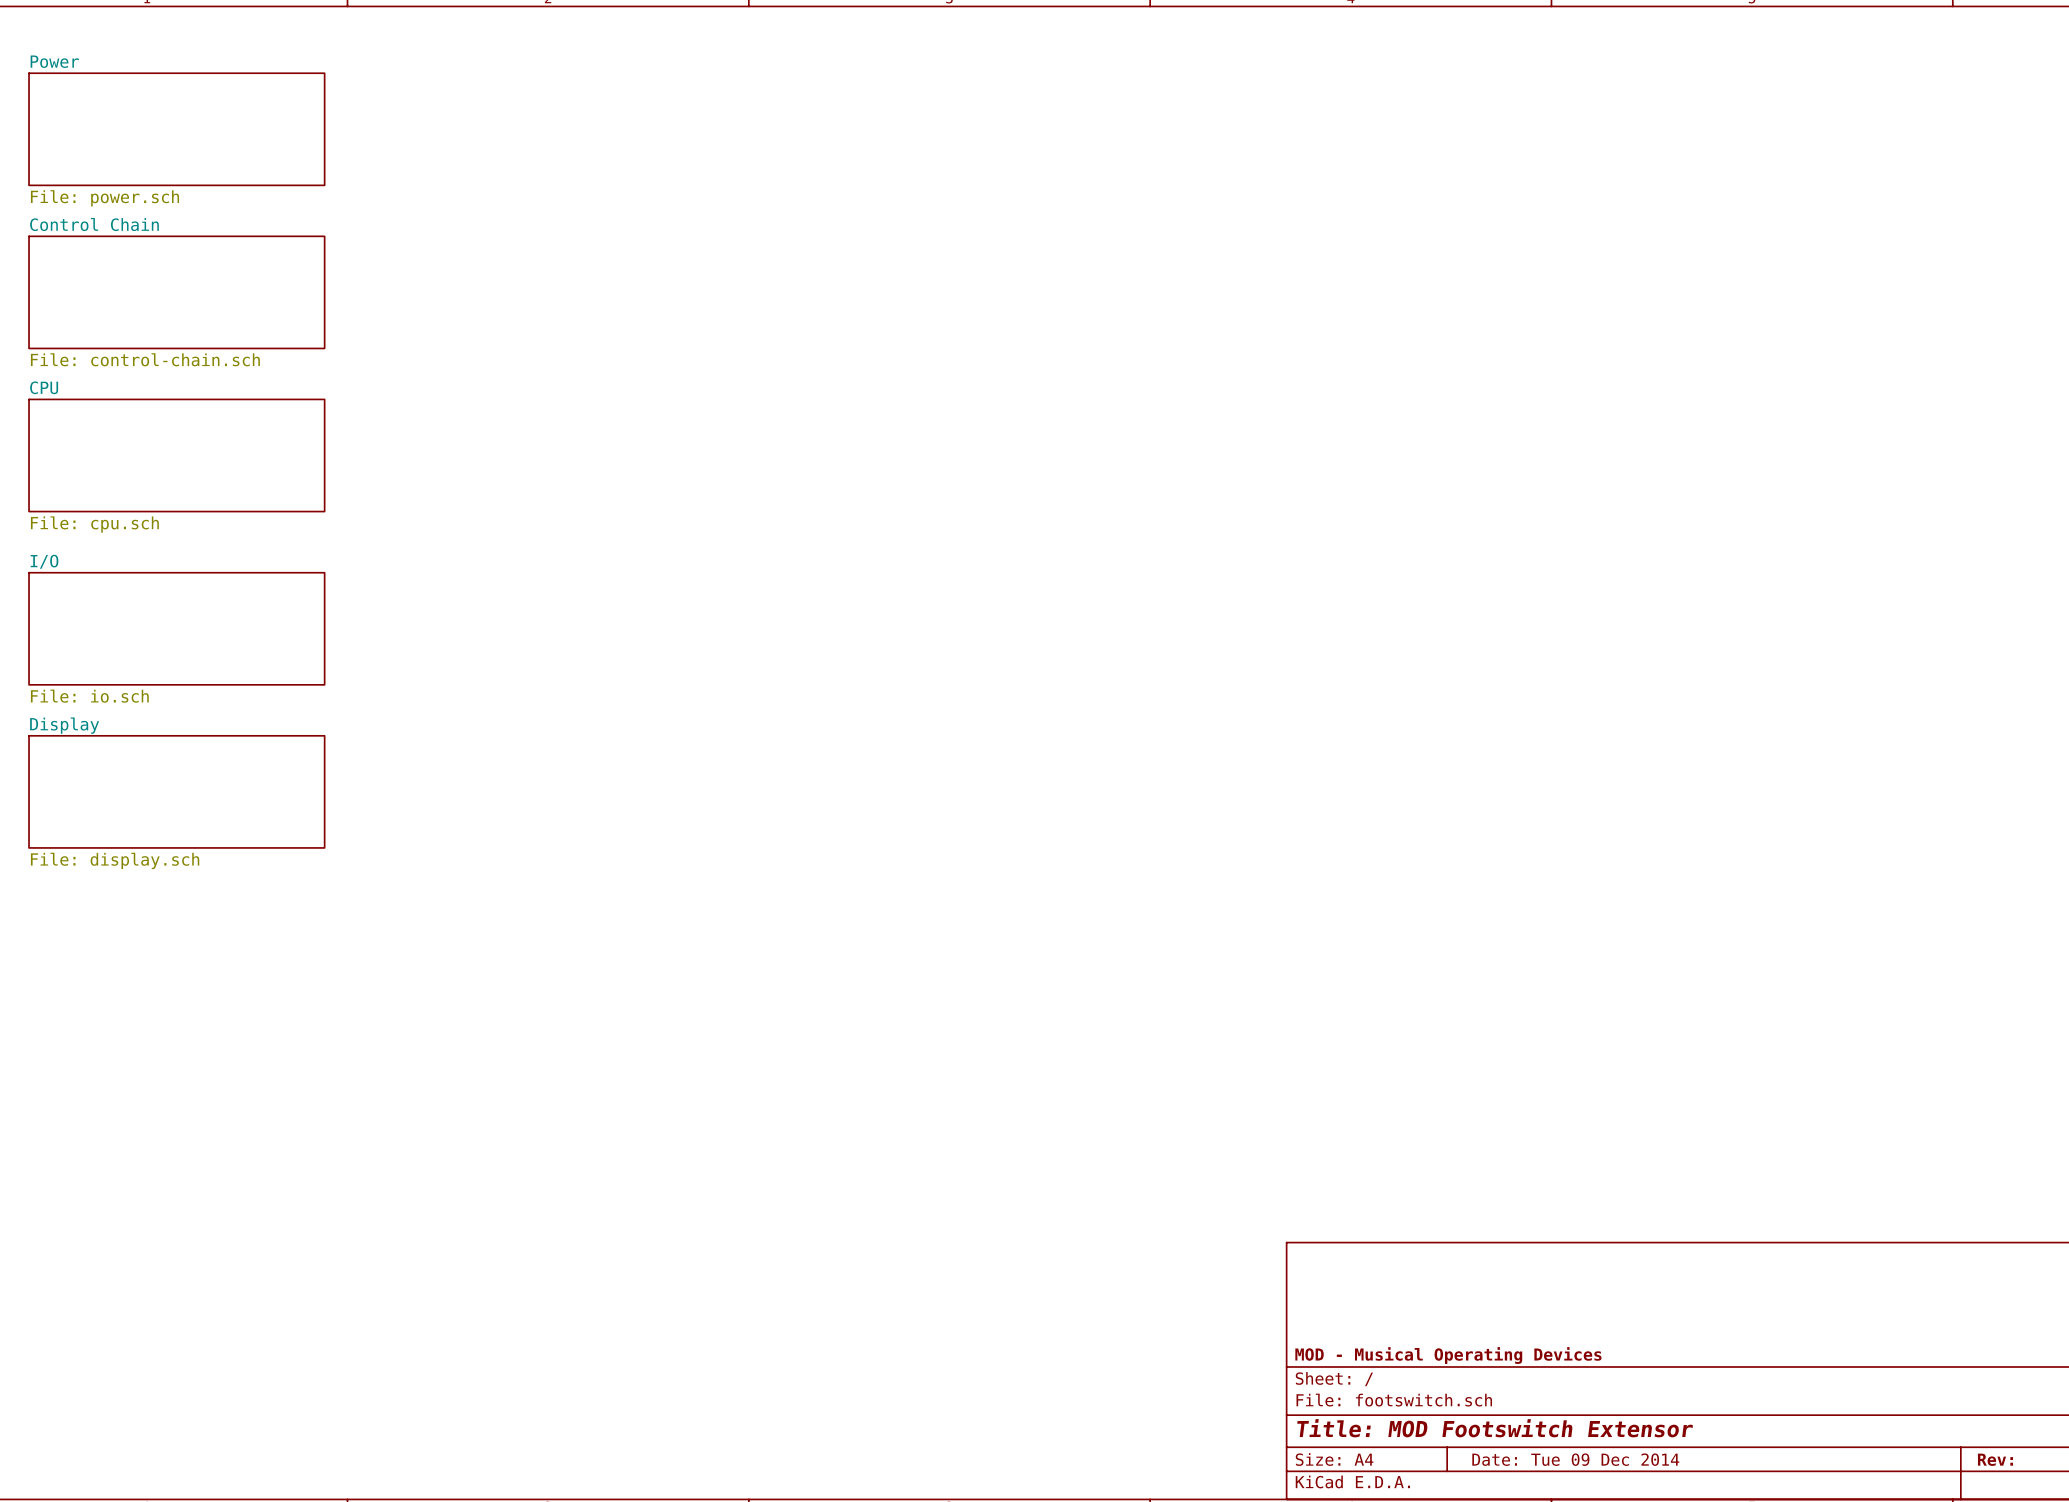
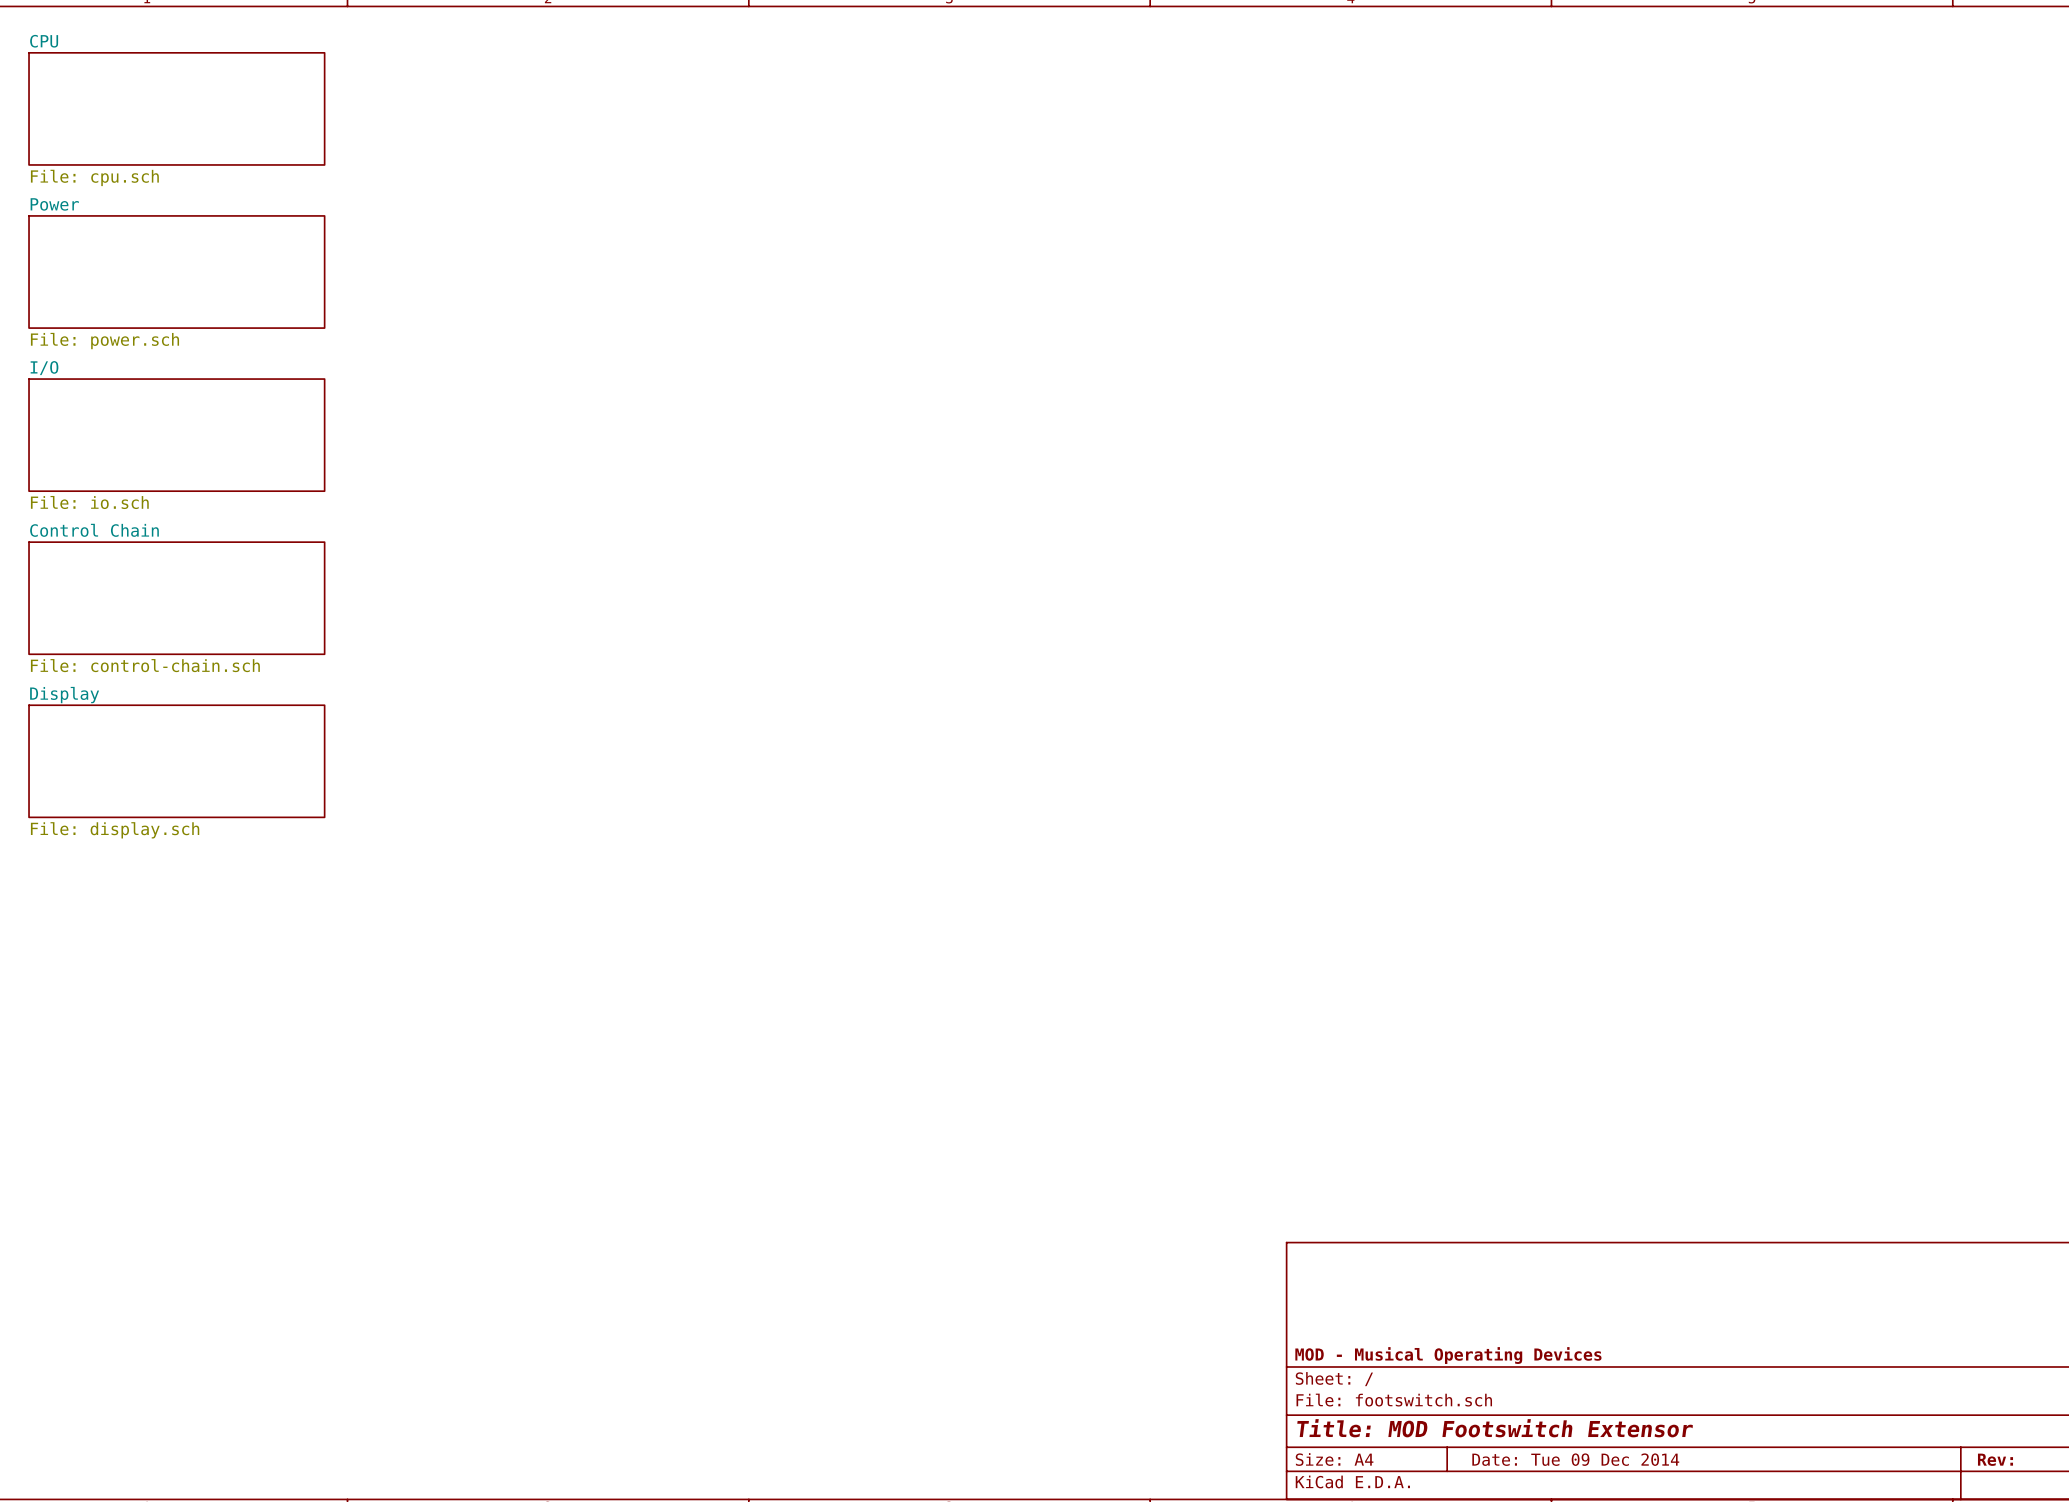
sheet CPU: none -> File: cpu.sch (176, 108)
sheet Power position: (176, 129) -> (176, 272)
sheet Control Chain: File: control-chain.sch (176, 292) -> none
sheet CPU: File: cpu.sch (176, 455) -> none
sheet Control Chain: none -> File: control-chain.sch (176, 598)
sheet I/O position: (176, 628) -> (176, 435)
sheet Display position: (176, 791) -> (176, 761)

